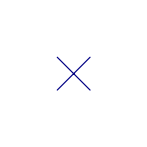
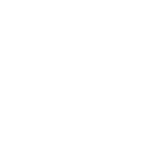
no-connect mark: (73, 73) -> none

